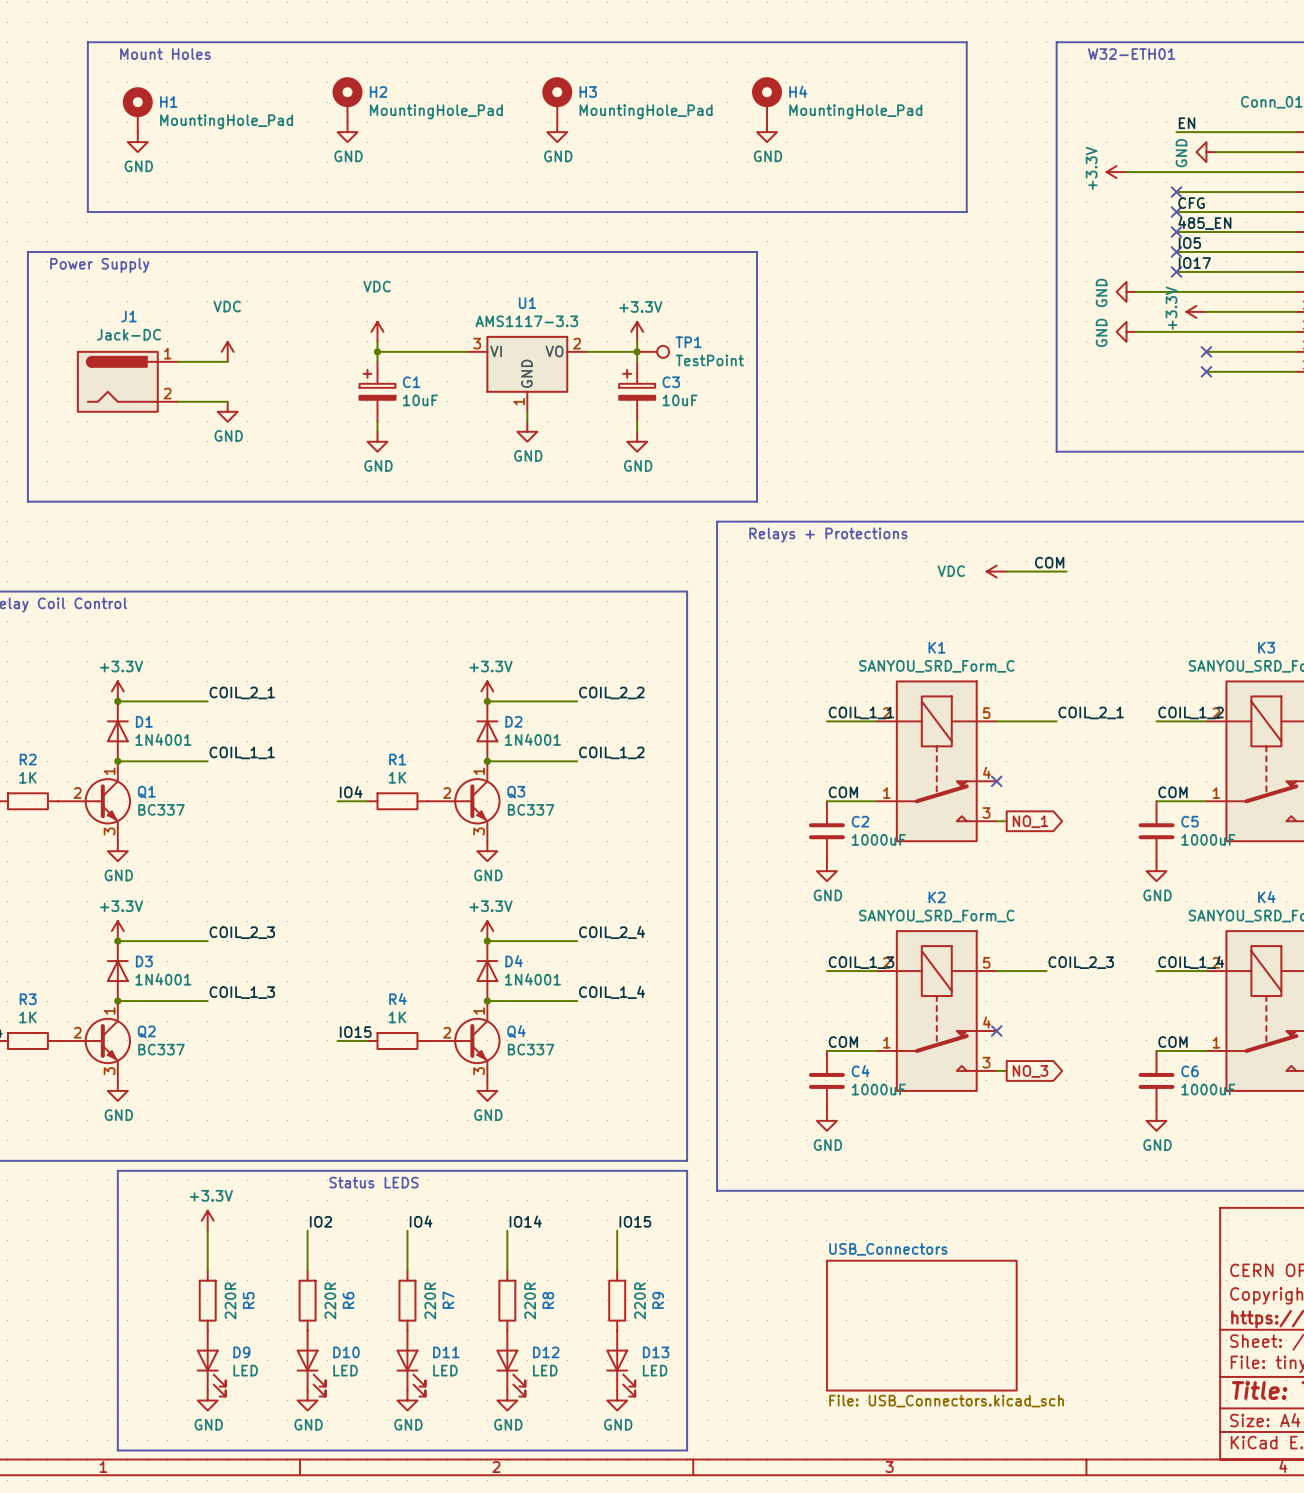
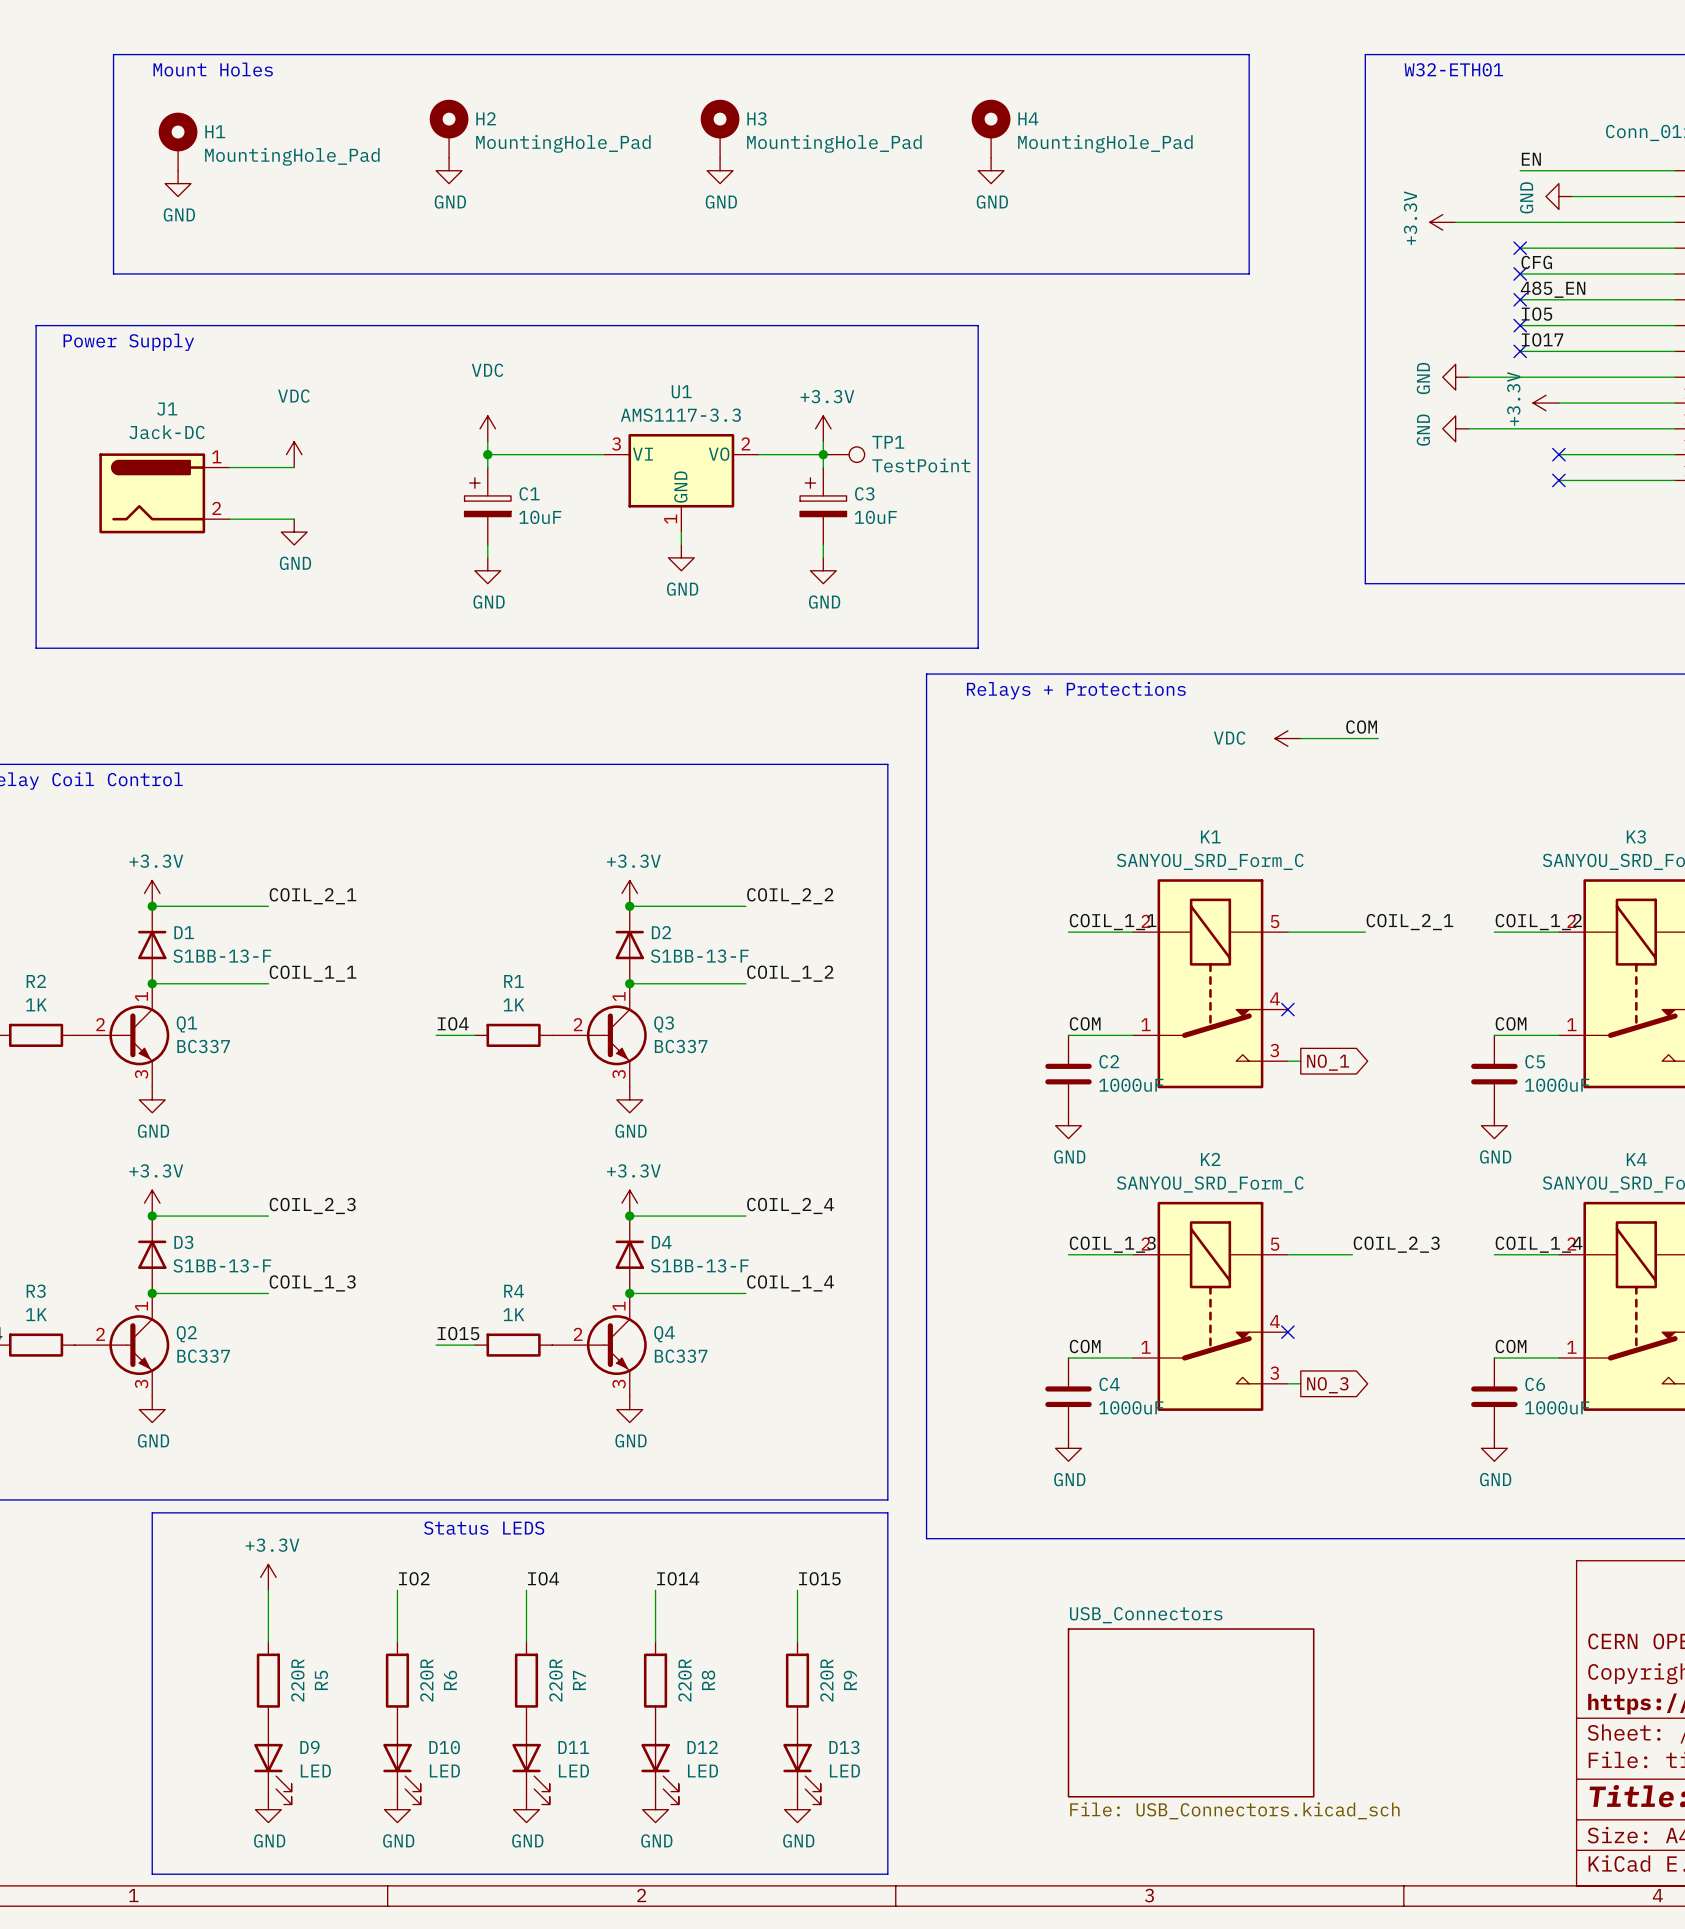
D1 value: 1N4001 (163, 739) -> S1BB-13-F (222, 956)
D2 value: 1N4001 (532, 739) -> S1BB-13-F (699, 956)
D3 value: 1N4001 (163, 979) -> S1BB-13-F (222, 1265)
D4 value: 1N4001 (532, 979) -> S1BB-13-F (699, 1265)

